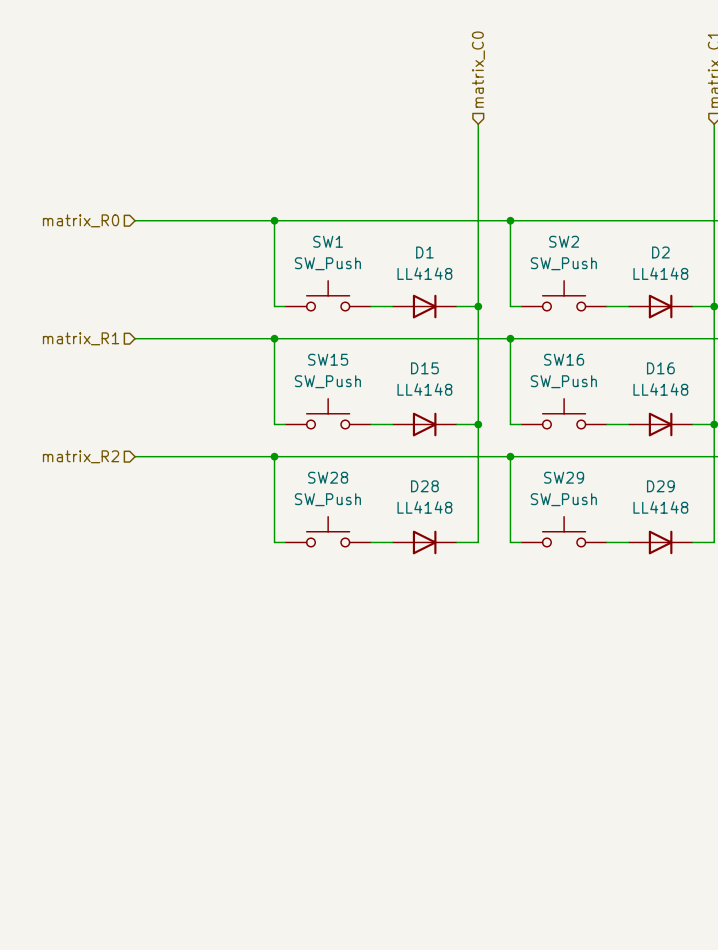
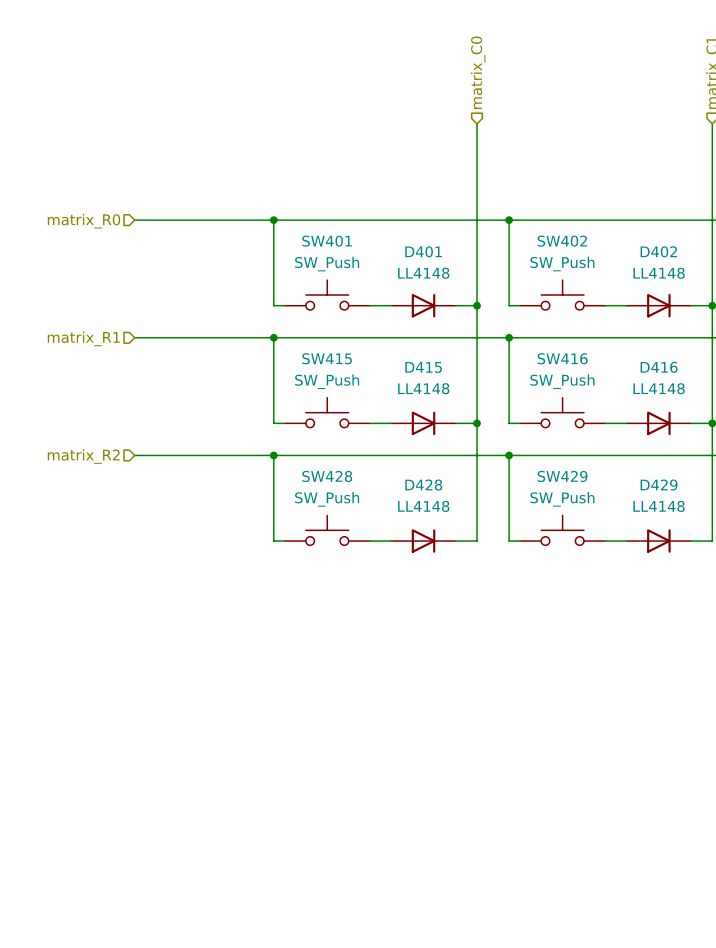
SW1 name: SW1 (328, 241) -> SW401 (327, 241)
SW2 name: SW2 (564, 241) -> SW402 (562, 241)
D1 name: D1 (424, 252) -> D401 (423, 251)
D2 name: D2 (660, 252) -> D402 (658, 251)
SW15 name: SW15 (328, 359) -> SW415 (327, 358)
SW16 name: SW16 (564, 359) -> SW416 (562, 358)
D15 name: D15 (424, 368) -> D415 (423, 367)
D16 name: D16 (660, 368) -> D416 (659, 367)
SW28 name: SW28 (328, 477) -> SW428 (327, 476)
SW29 name: SW29 (564, 477) -> SW429 (562, 476)
D28 name: D28 (424, 486) -> D428 (423, 485)
D29 name: D29 (660, 486) -> D429 (659, 485)

